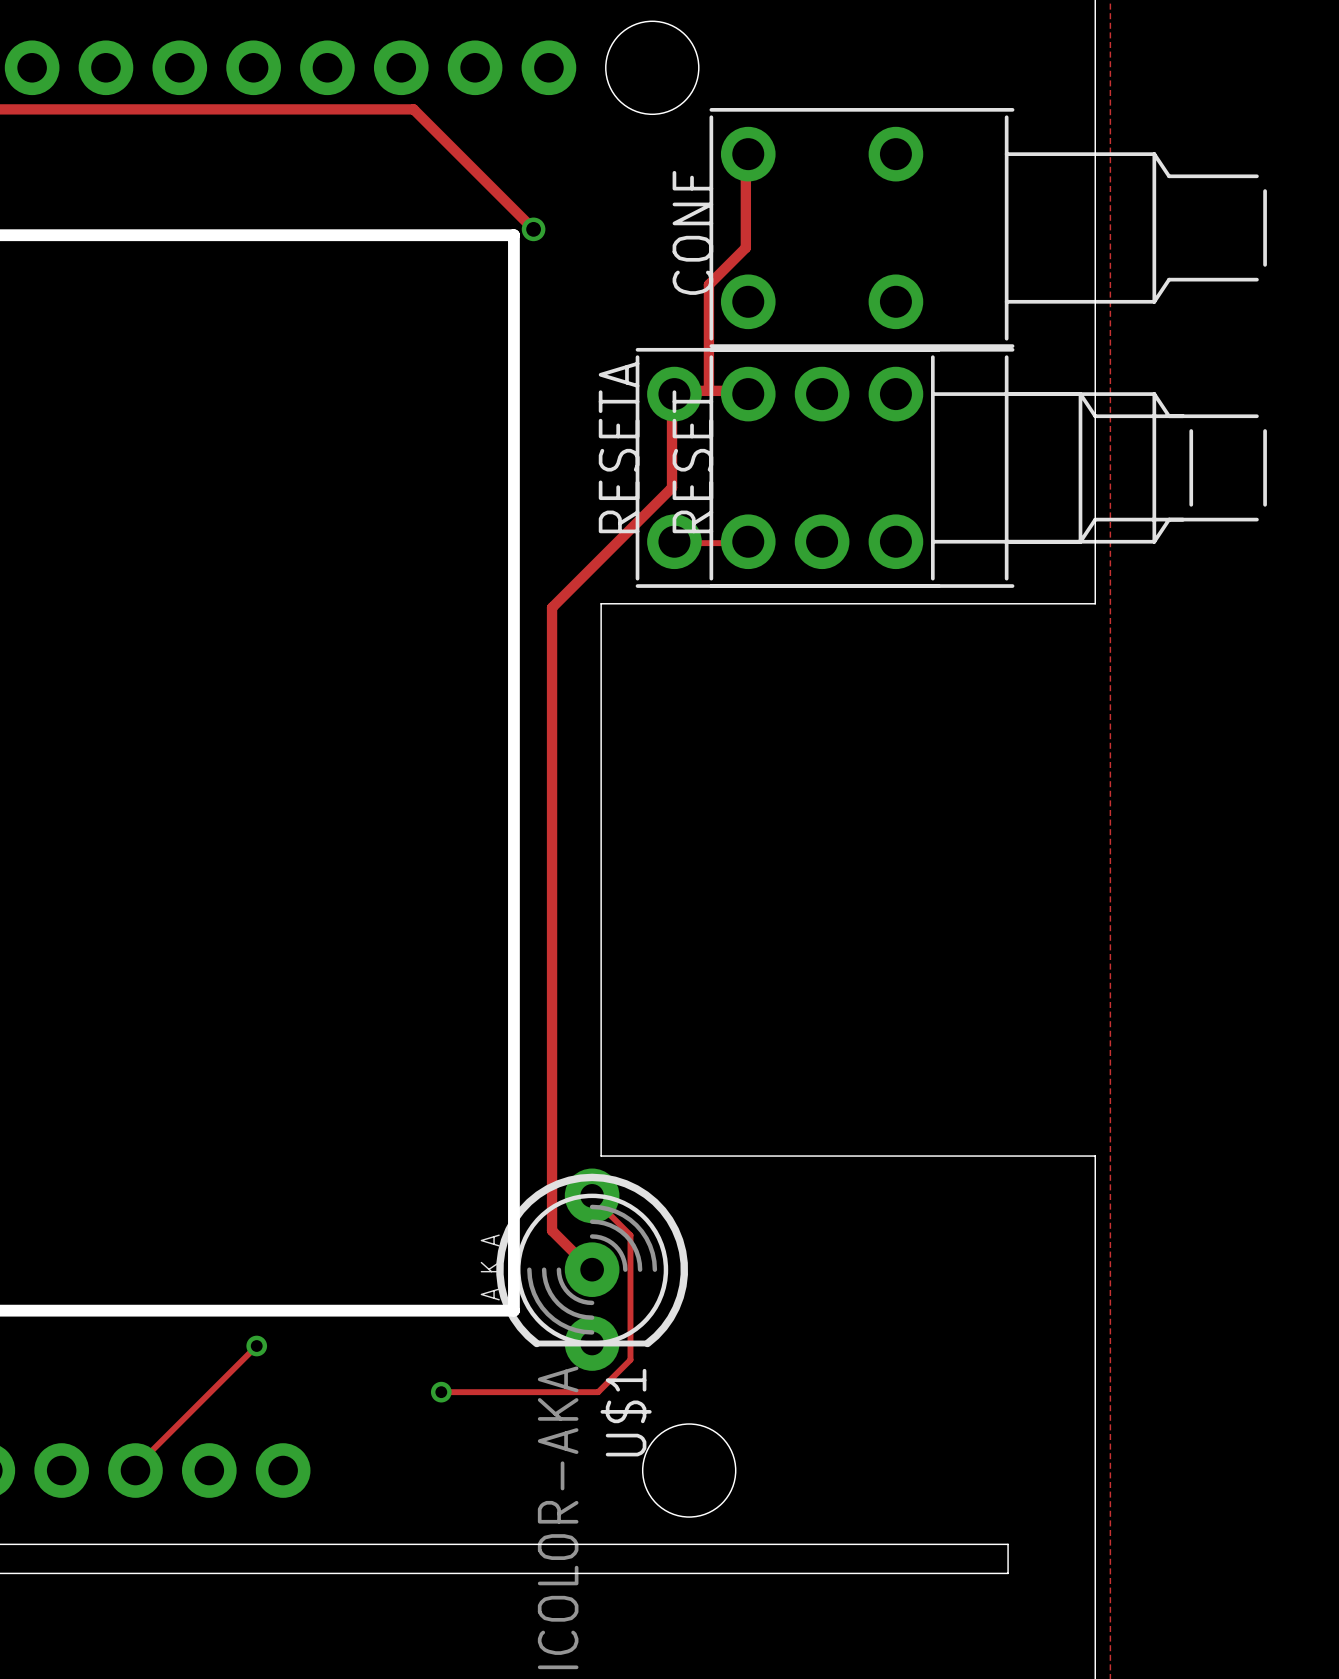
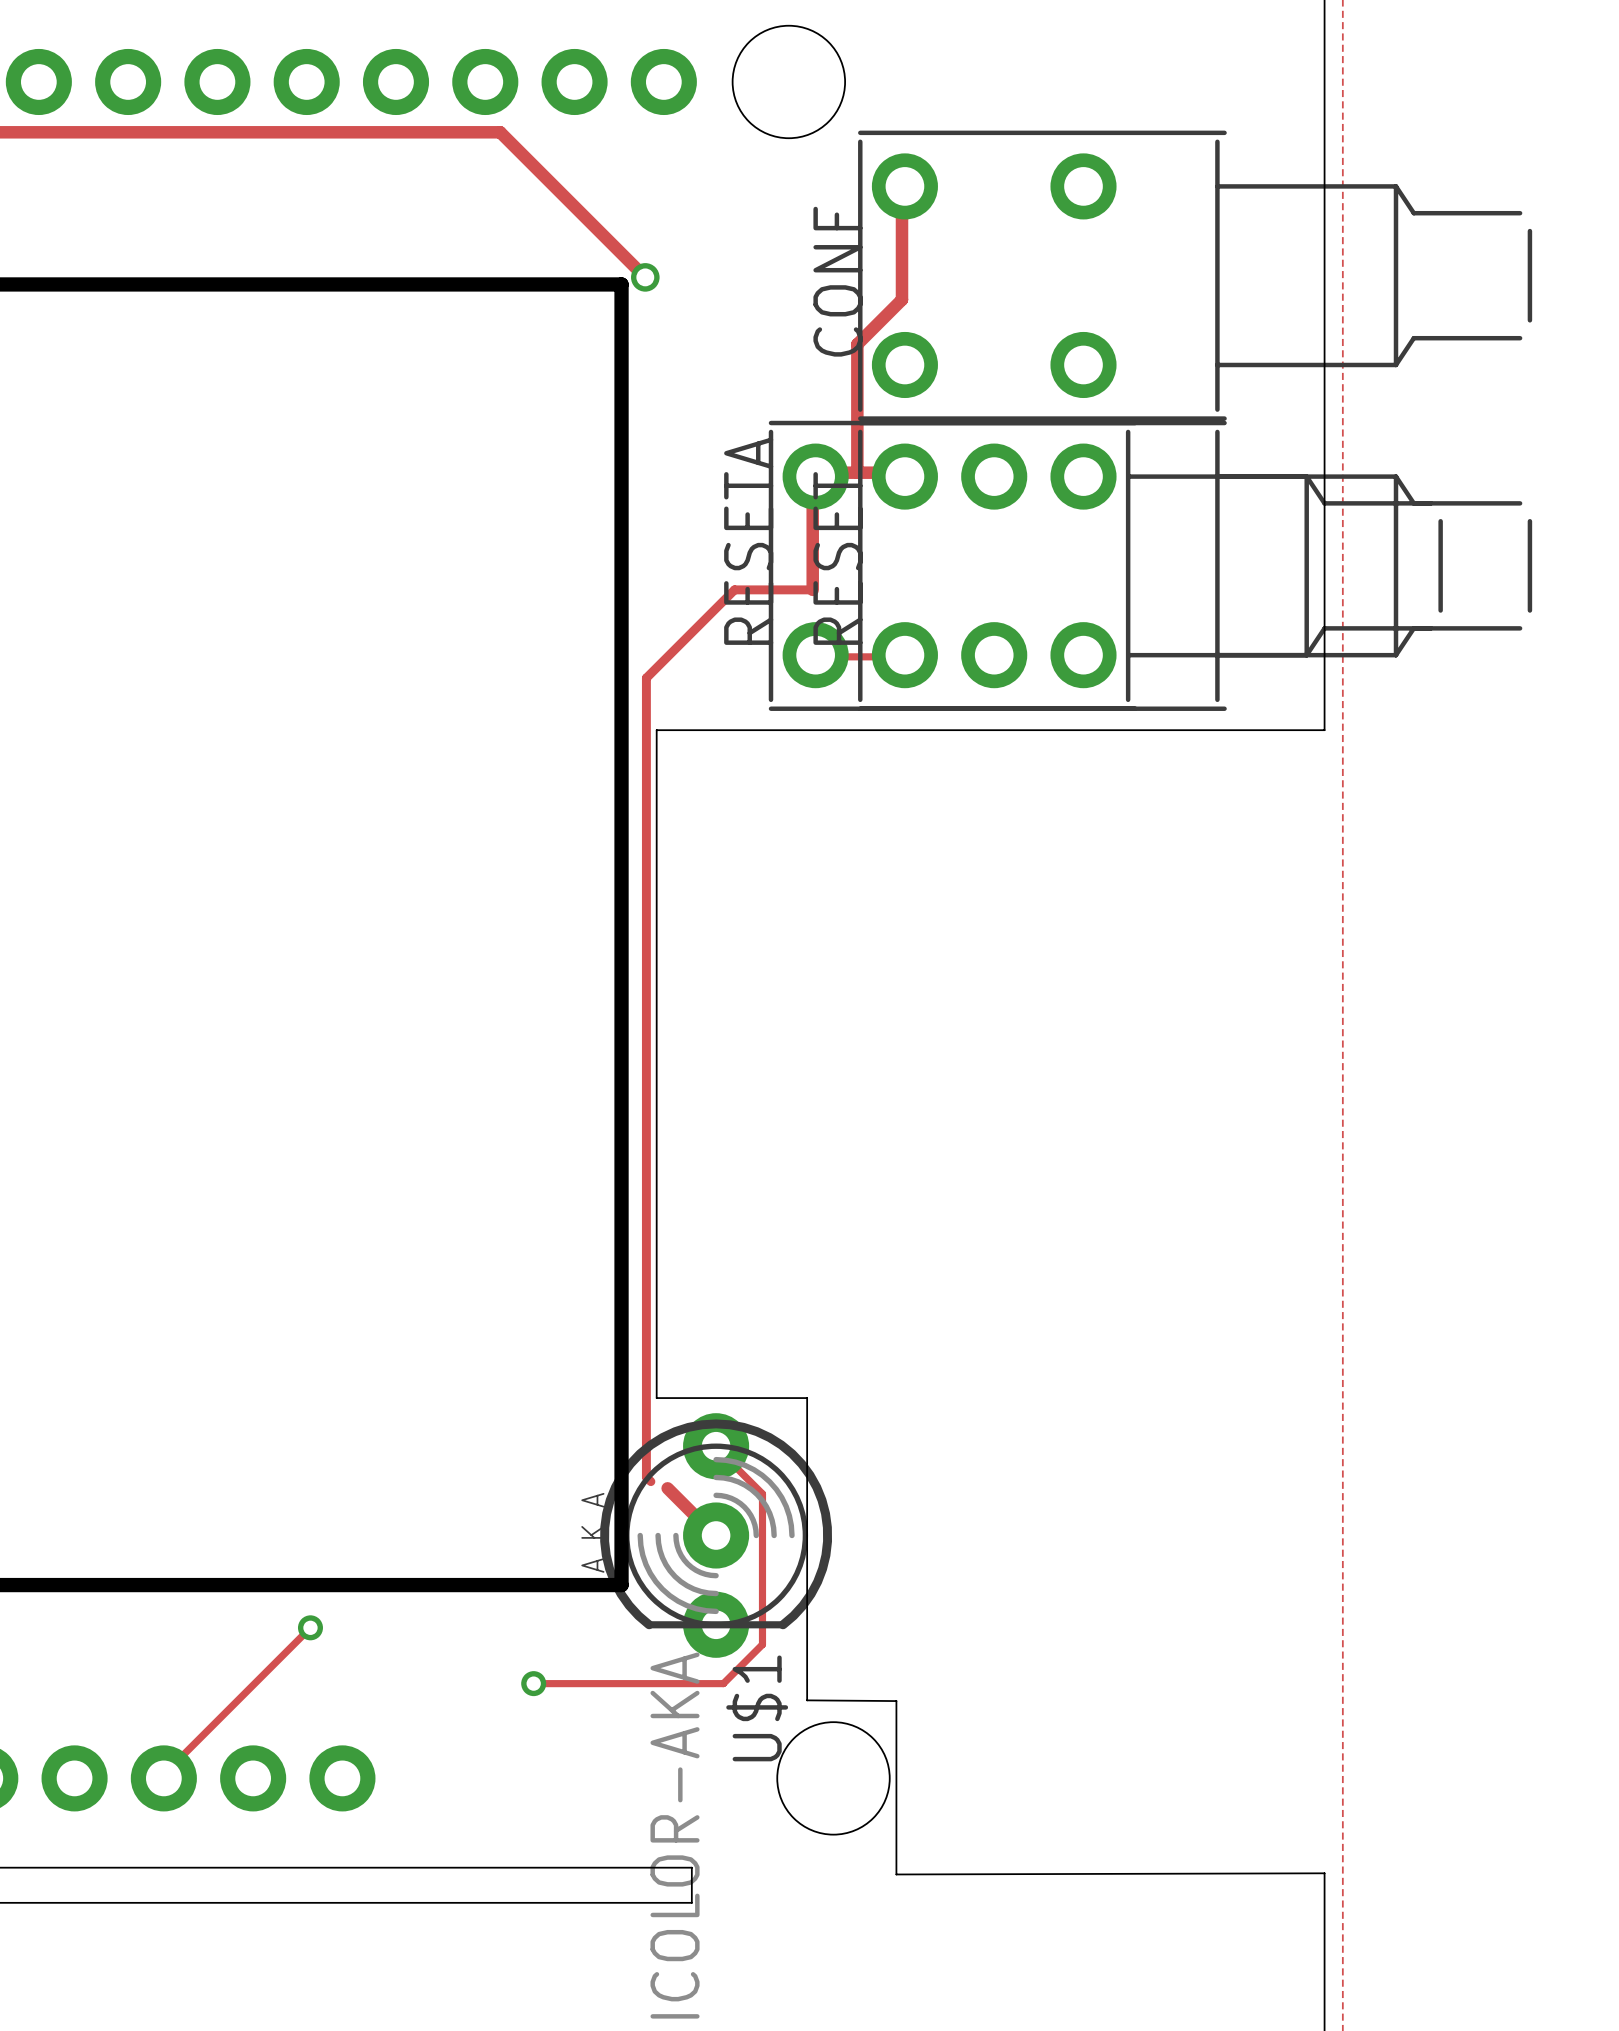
track: (672, 487) (552, 607) (552, 1230) -> (812, 589) (734, 589) (646, 678) (646, 1477) (650, 1481)
board edge: (601, 603) (601, 1156) -> (726, 730) (656, 730) (656, 1398) (726, 1398)
board edge: (667, 1156) (1095, 1156) (1095, 1549) -> (807, 1398) (807, 1700) (896, 1701) (896, 1874) (1324, 1873)
board edge: (572, 1544) (1008, 1544) (1008, 1573) (572, 1573) -> (691, 1867) (691, 1902)

